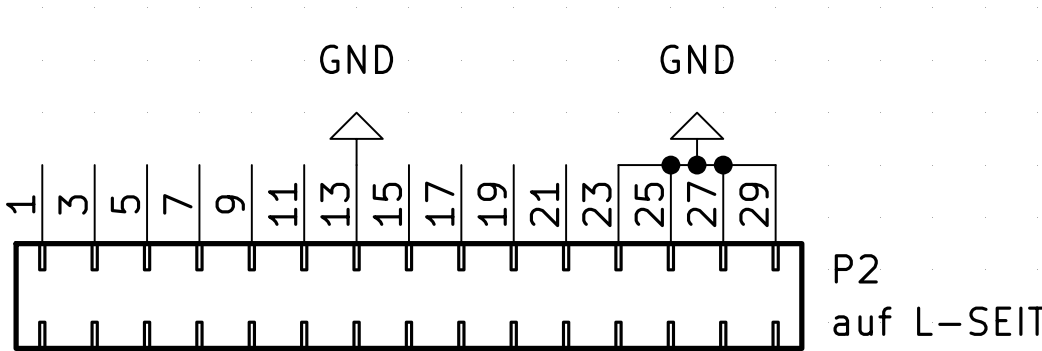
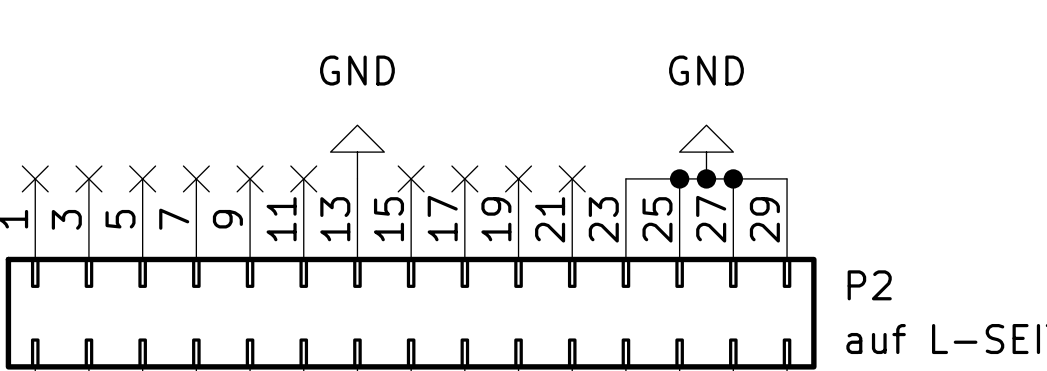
no-connect mark: none -> (35, 178)
no-connect mark: none -> (88, 178)
no-connect mark: none -> (142, 178)
no-connect mark: none -> (196, 178)
no-connect mark: none -> (250, 178)
no-connect mark: none -> (303, 178)
no-connect mark: none -> (411, 178)
no-connect mark: none -> (464, 178)
no-connect mark: none -> (518, 178)
no-connect mark: none -> (572, 178)

